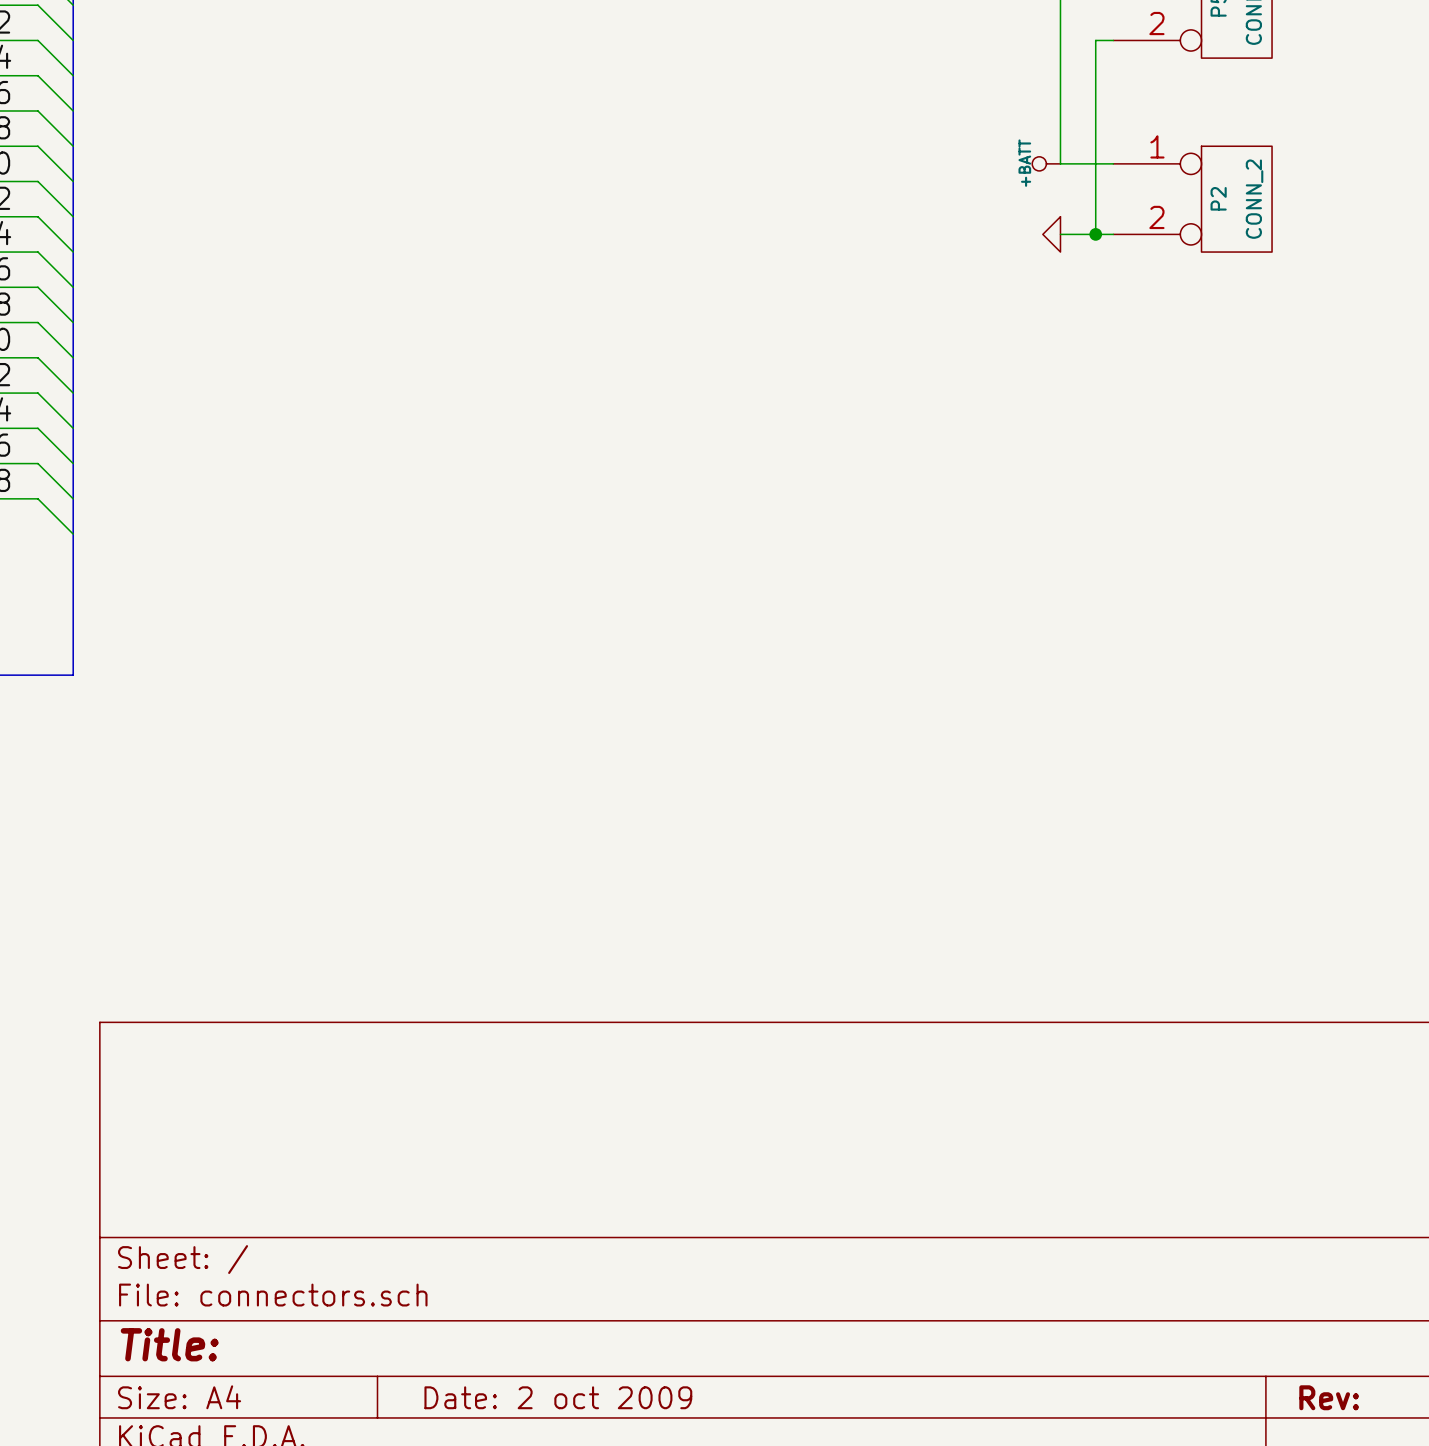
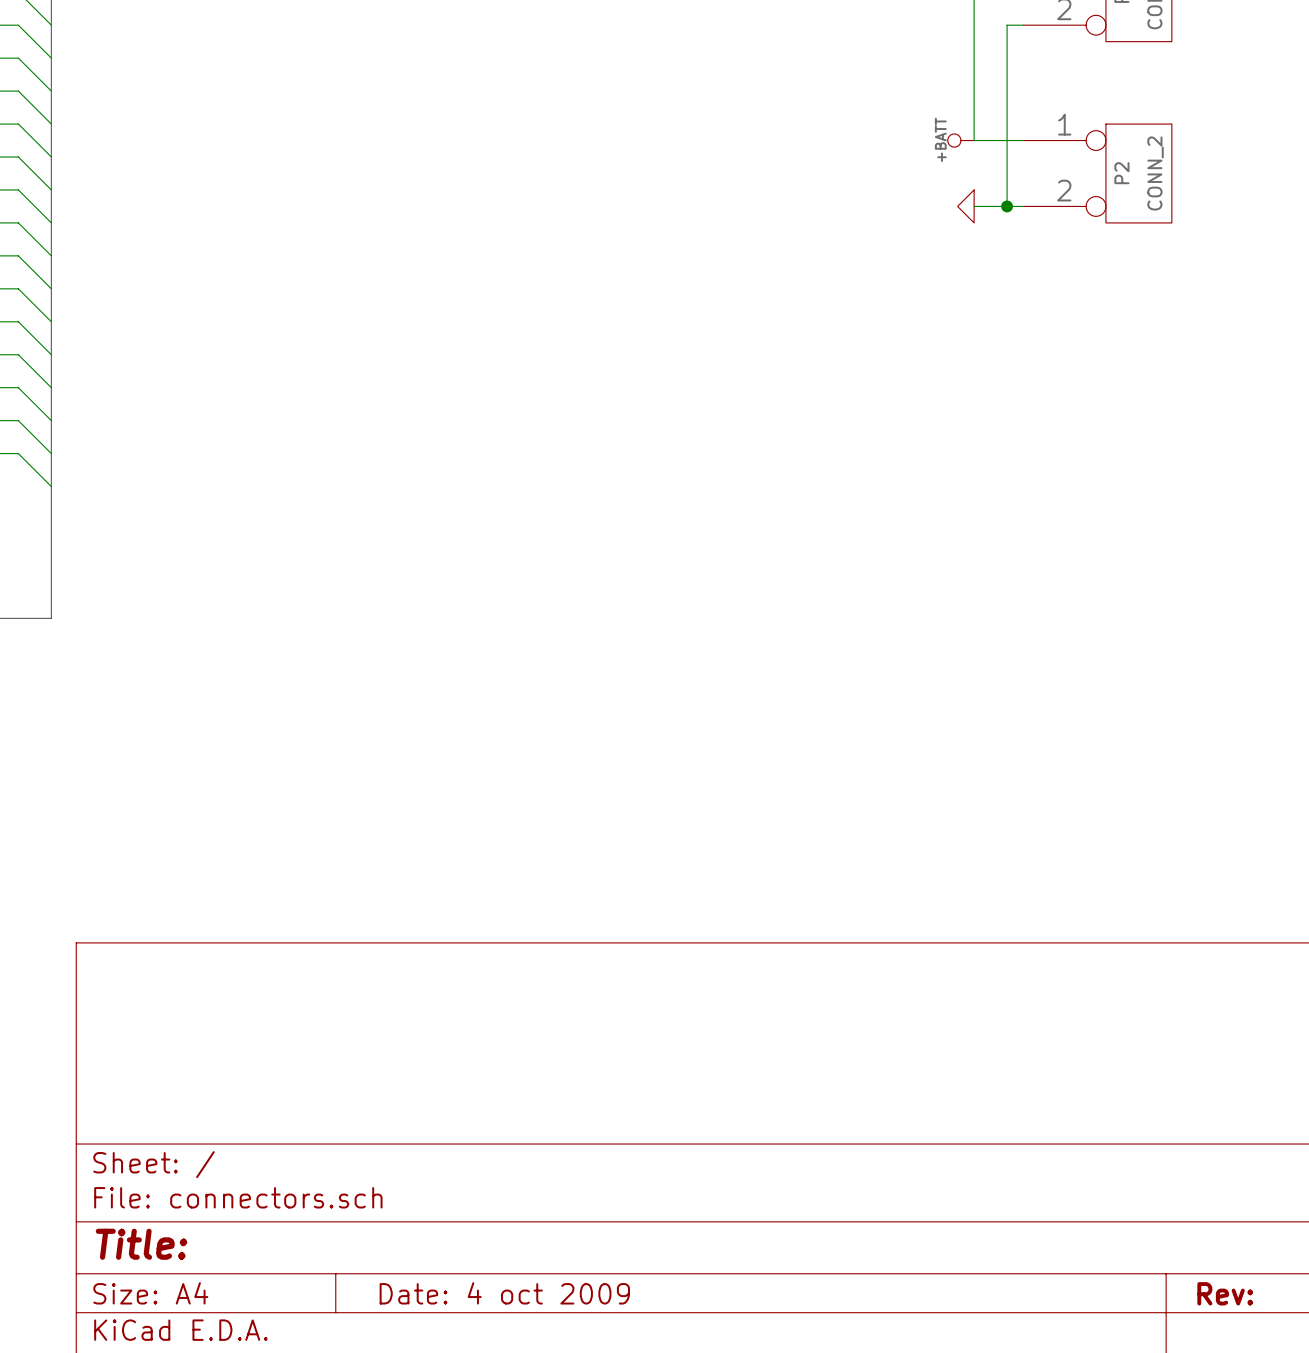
title block: Date: 2 oct 2009 (558, 1397) -> Date: 4 oct 2009 (504, 1293)

